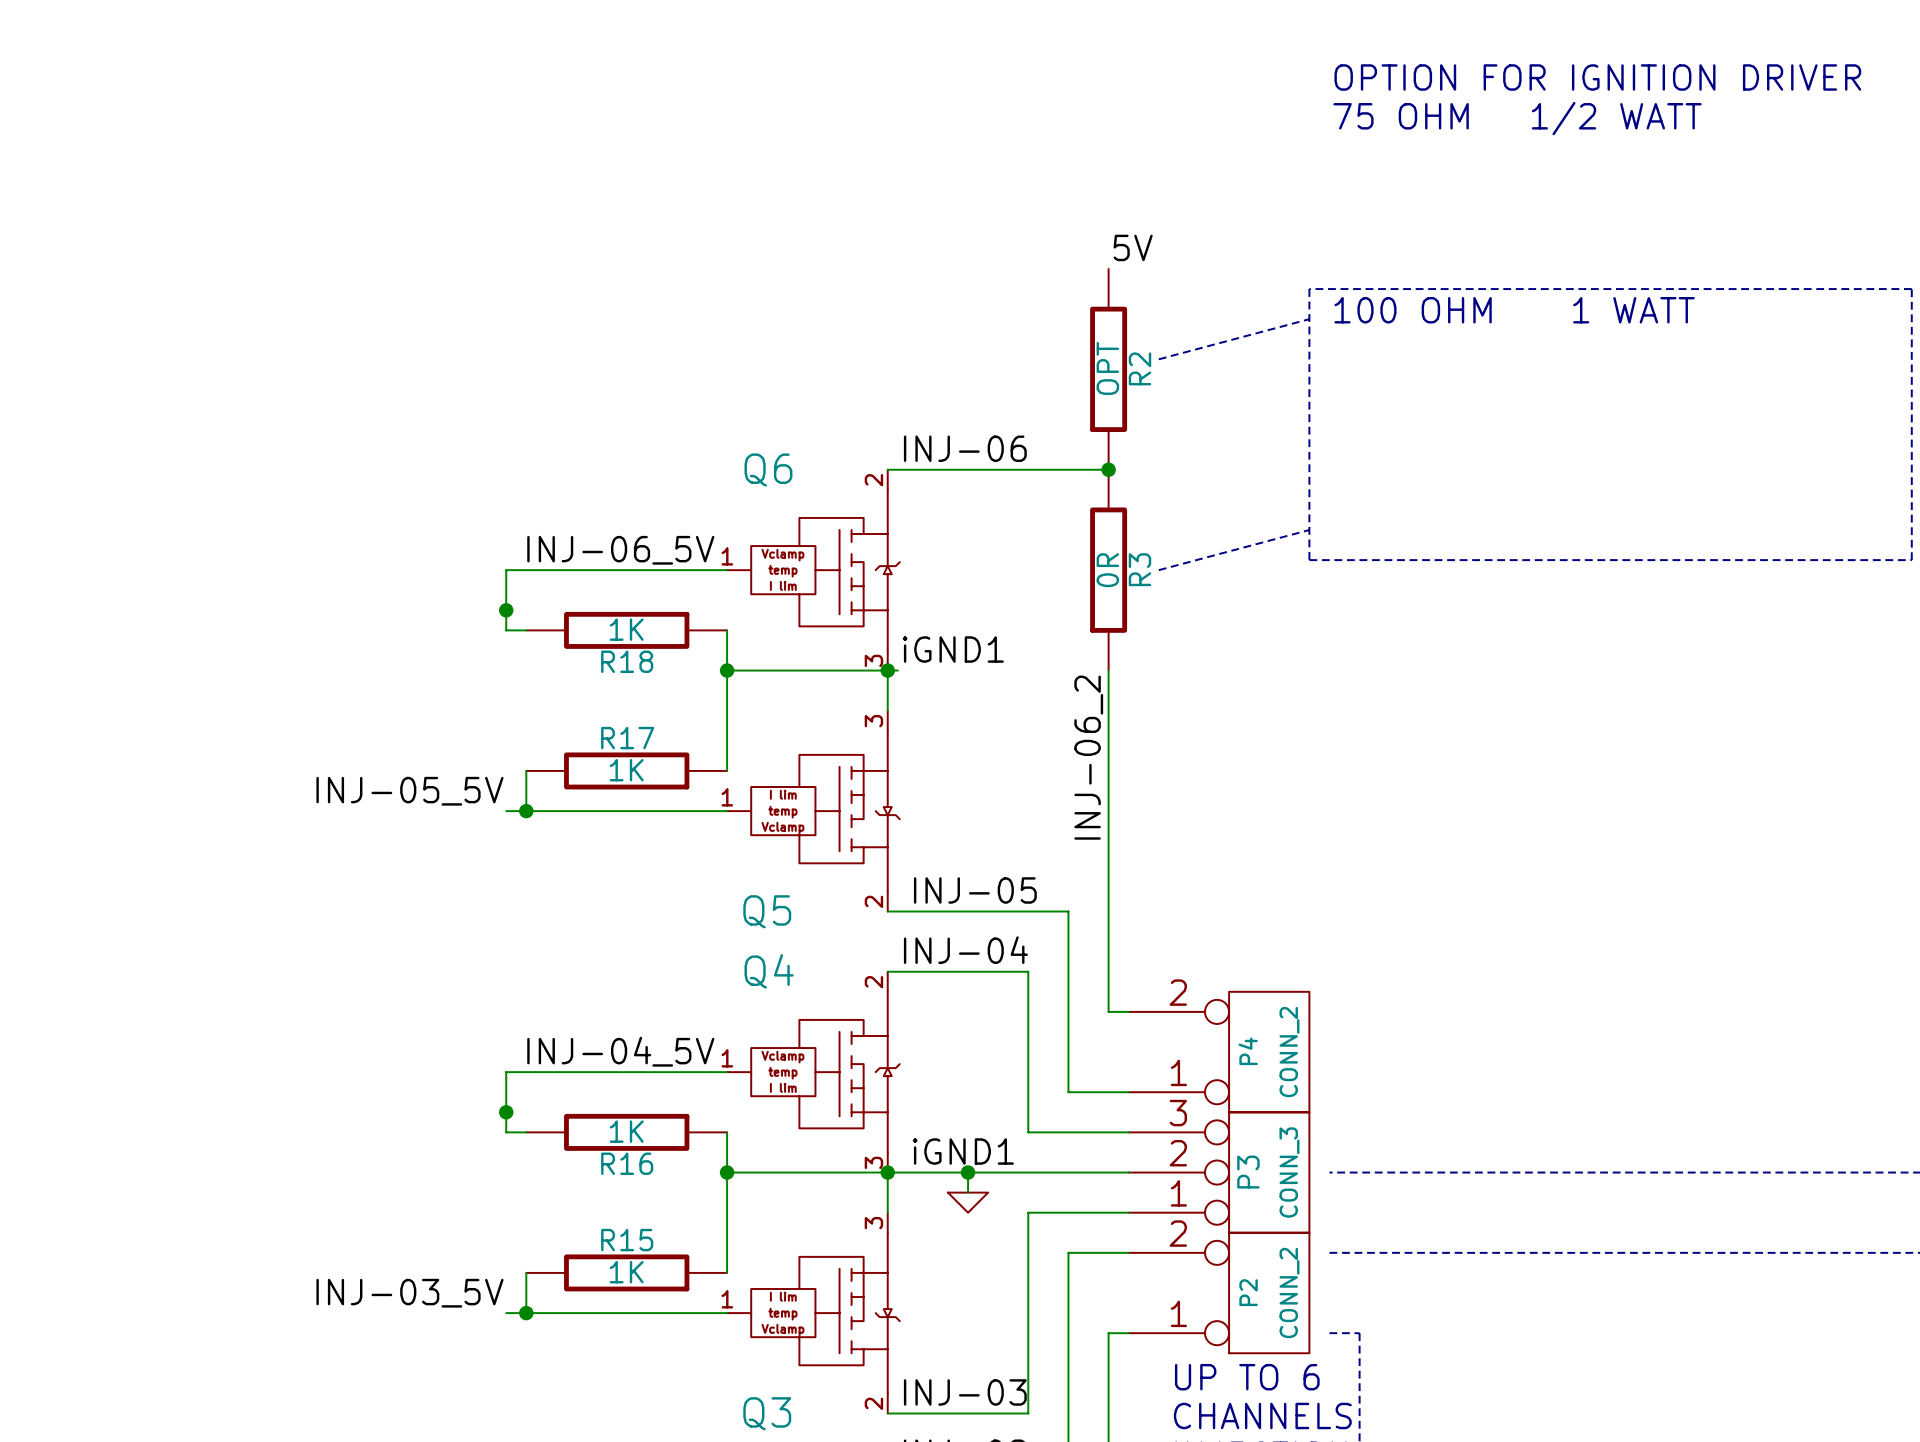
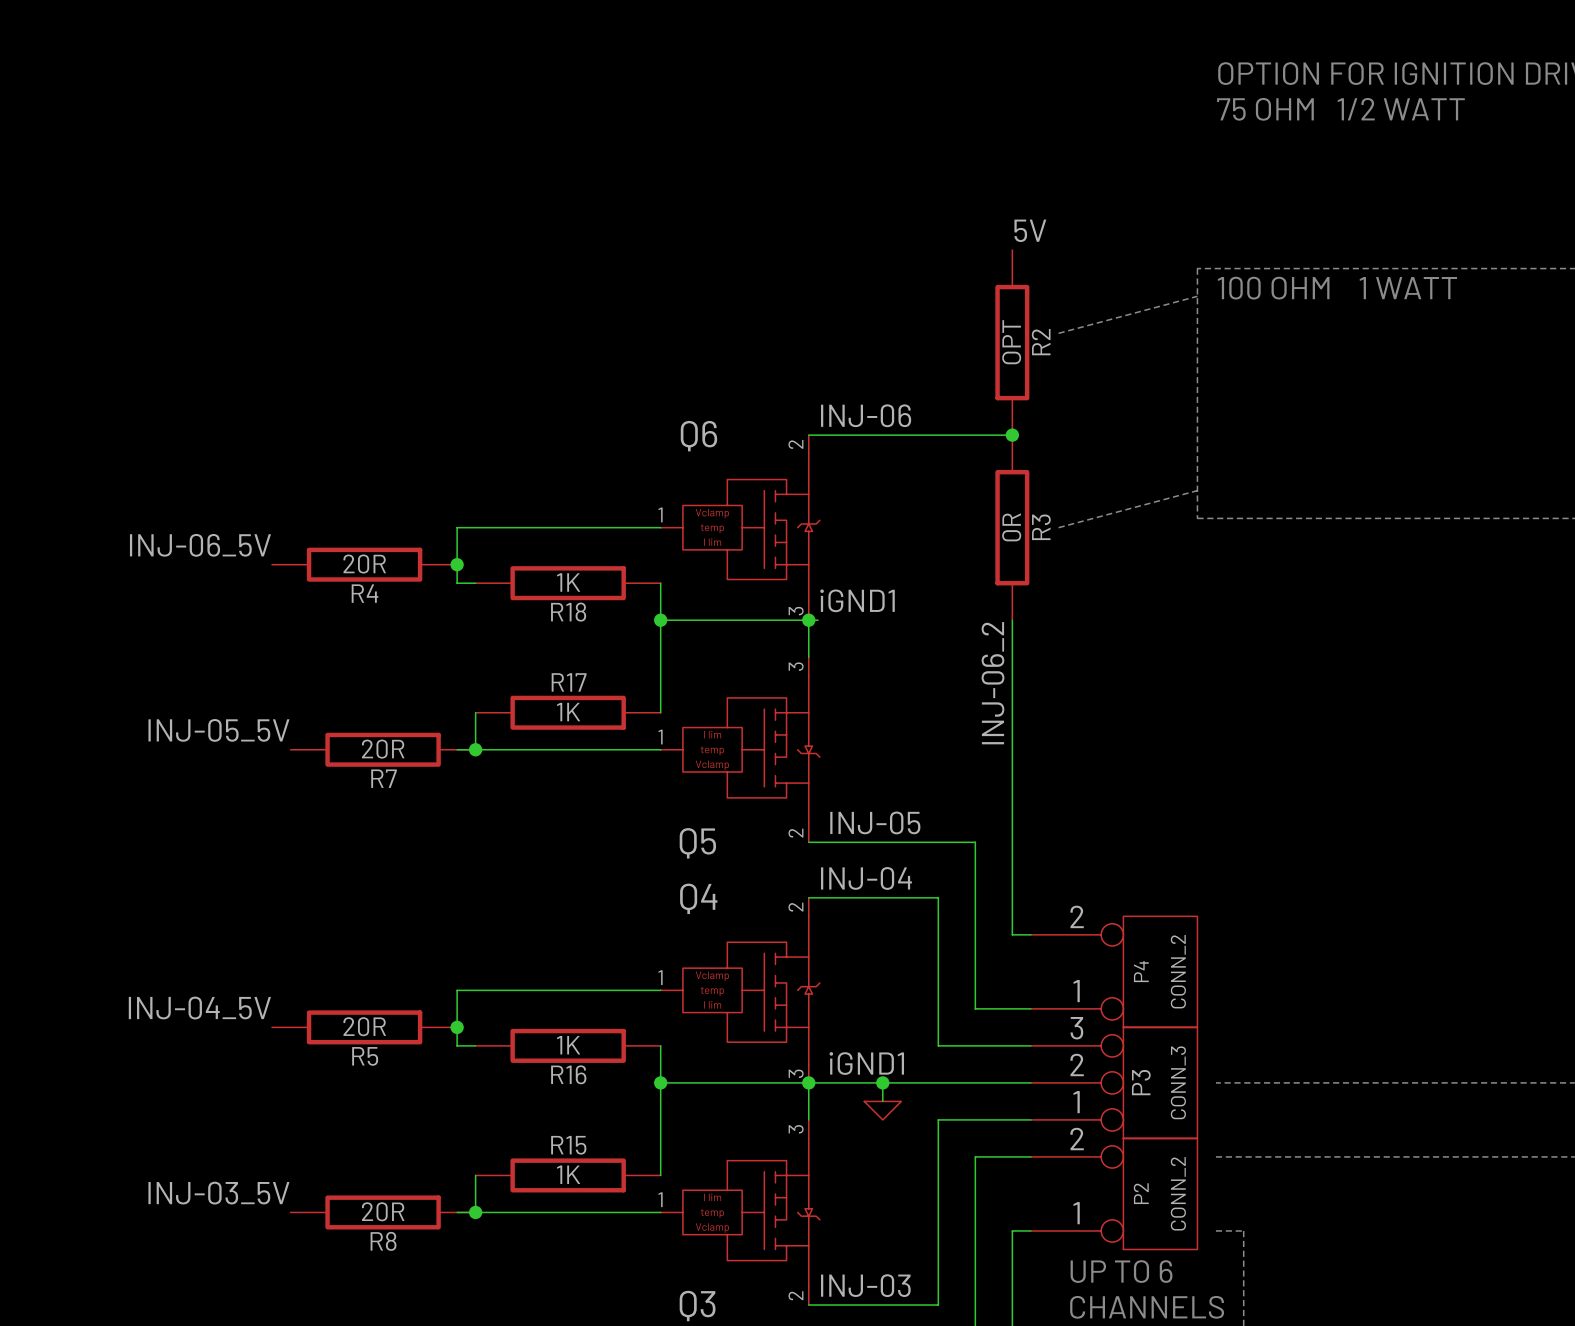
label: INJ-06_5V (620, 550) -> none
label: none -> INJ-06_5V (200, 545)
R4: none -> 20R (364, 564)
label position: INJ-05_5V (409, 791) -> INJ-05_5V (218, 730)
R7: none -> 20R (383, 749)
label: INJ-04_5V (620, 1051) -> none
label: none -> INJ-04_5V (199, 1008)
R5: none -> 20R (364, 1027)
label position: INJ-03_5V (409, 1293) -> INJ-03_5V (218, 1193)
R8: none -> 20R (383, 1212)

